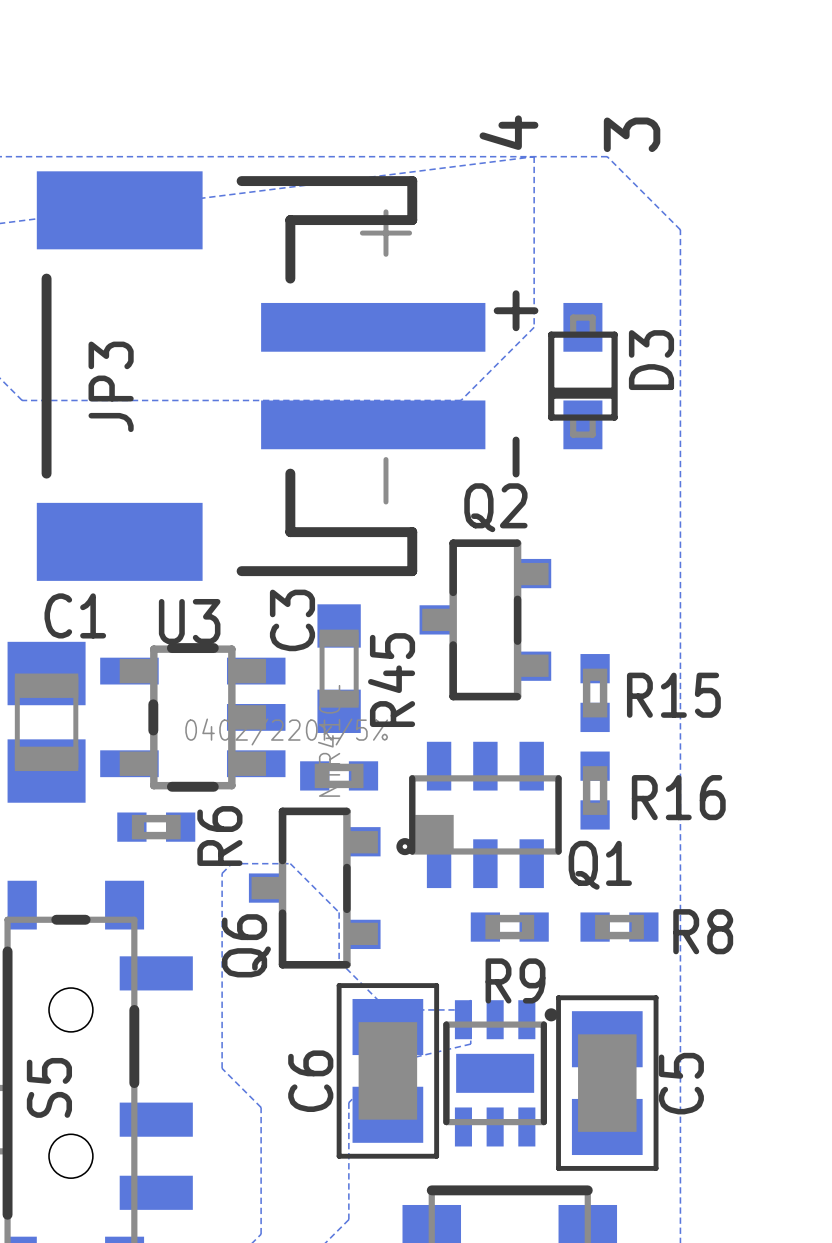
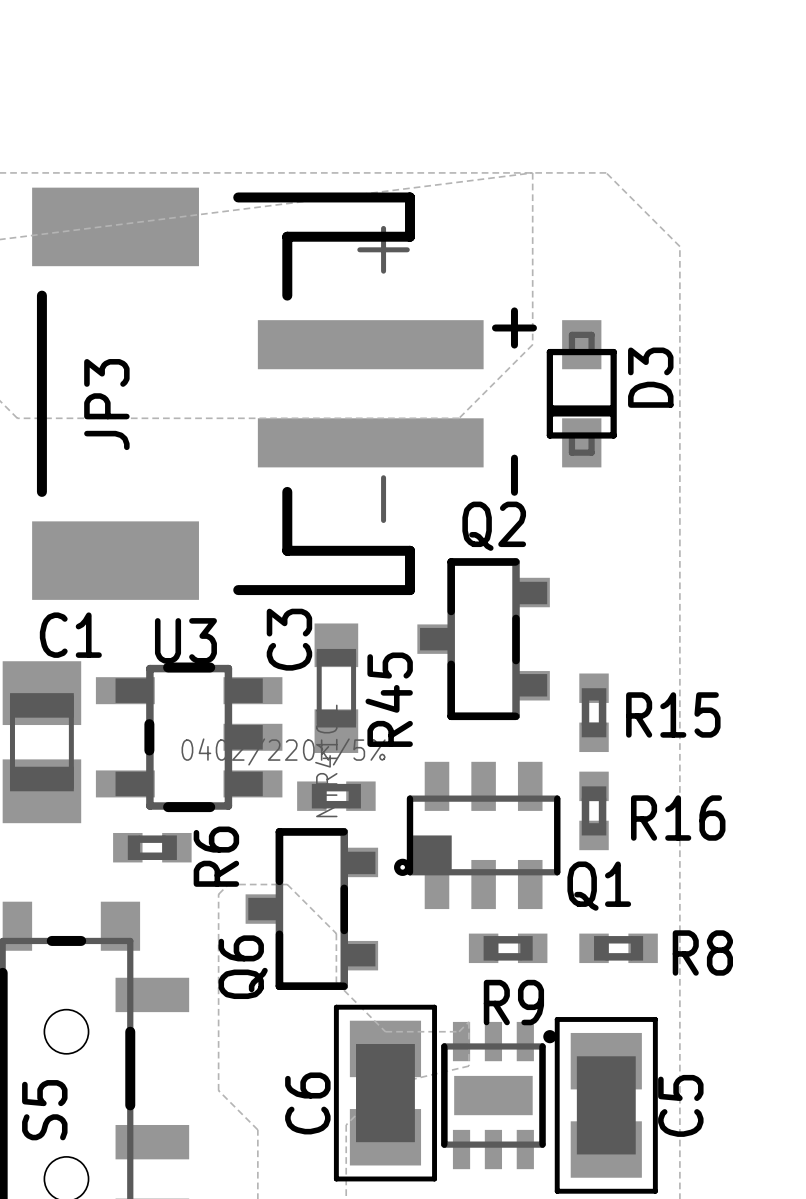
text: 4 (508, 132) -> none
text: 3 (632, 134) -> none

